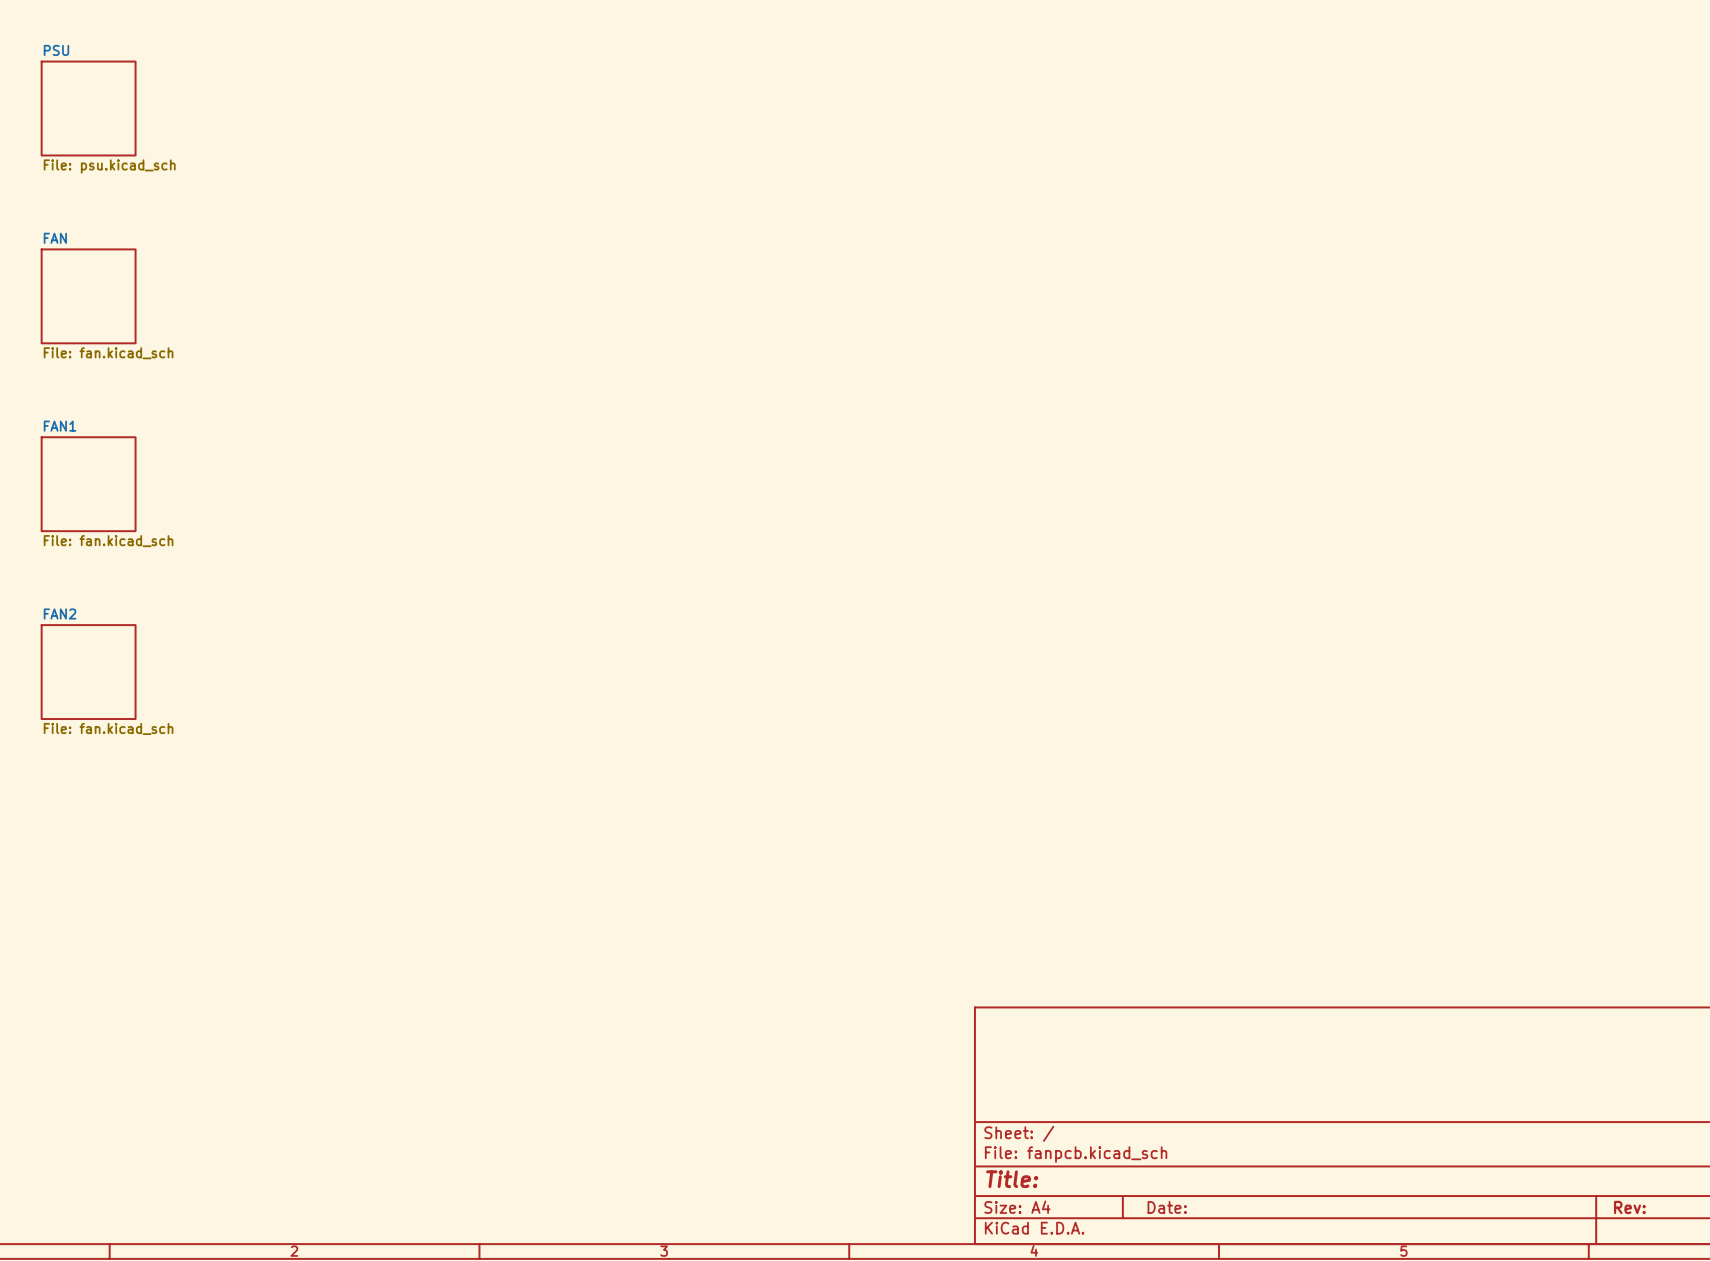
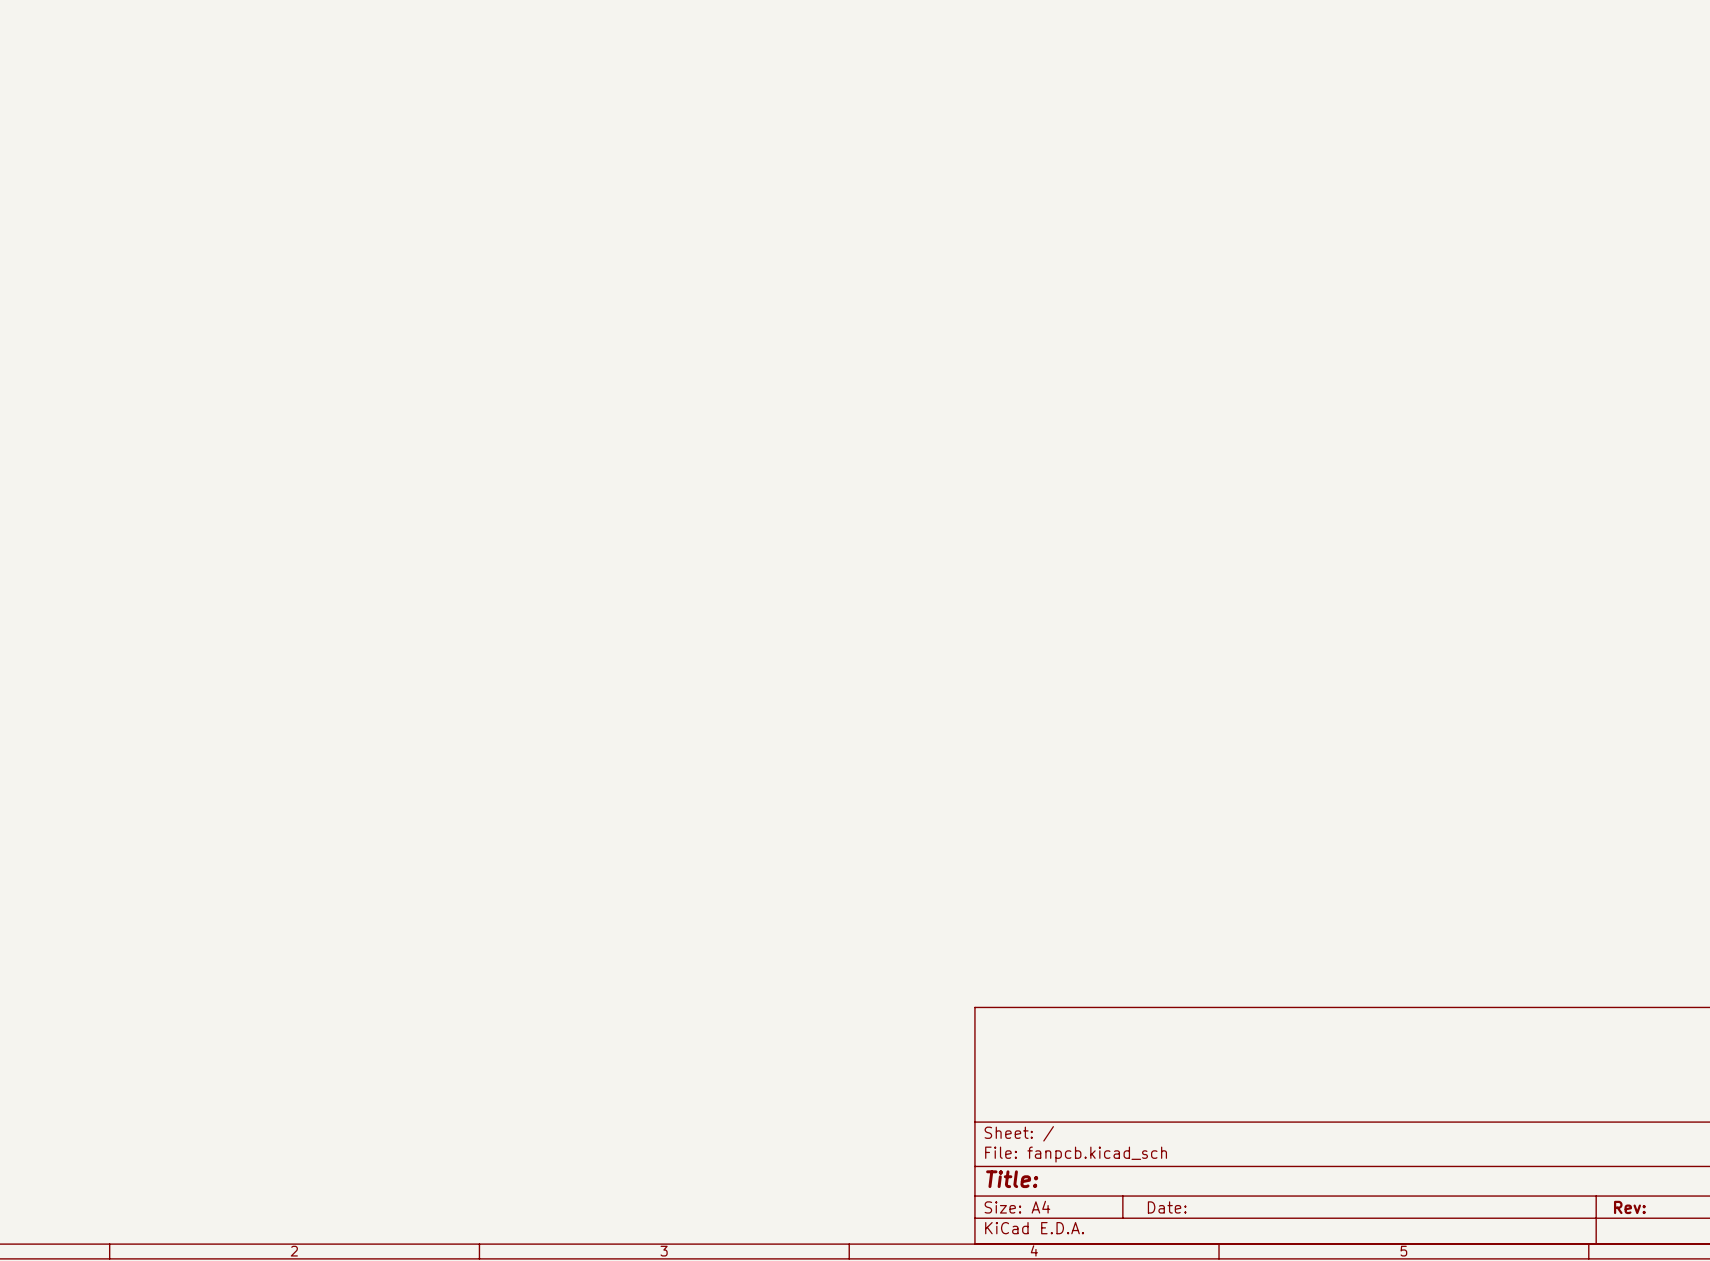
sheet PSU: File: psu.kicad_sch (88, 108) -> none
sheet FAN: File: fan.kicad_sch (88, 296) -> none
sheet FAN1: File: fan.kicad_sch (88, 484) -> none
sheet FAN2: File: fan.kicad_sch (88, 672) -> none

